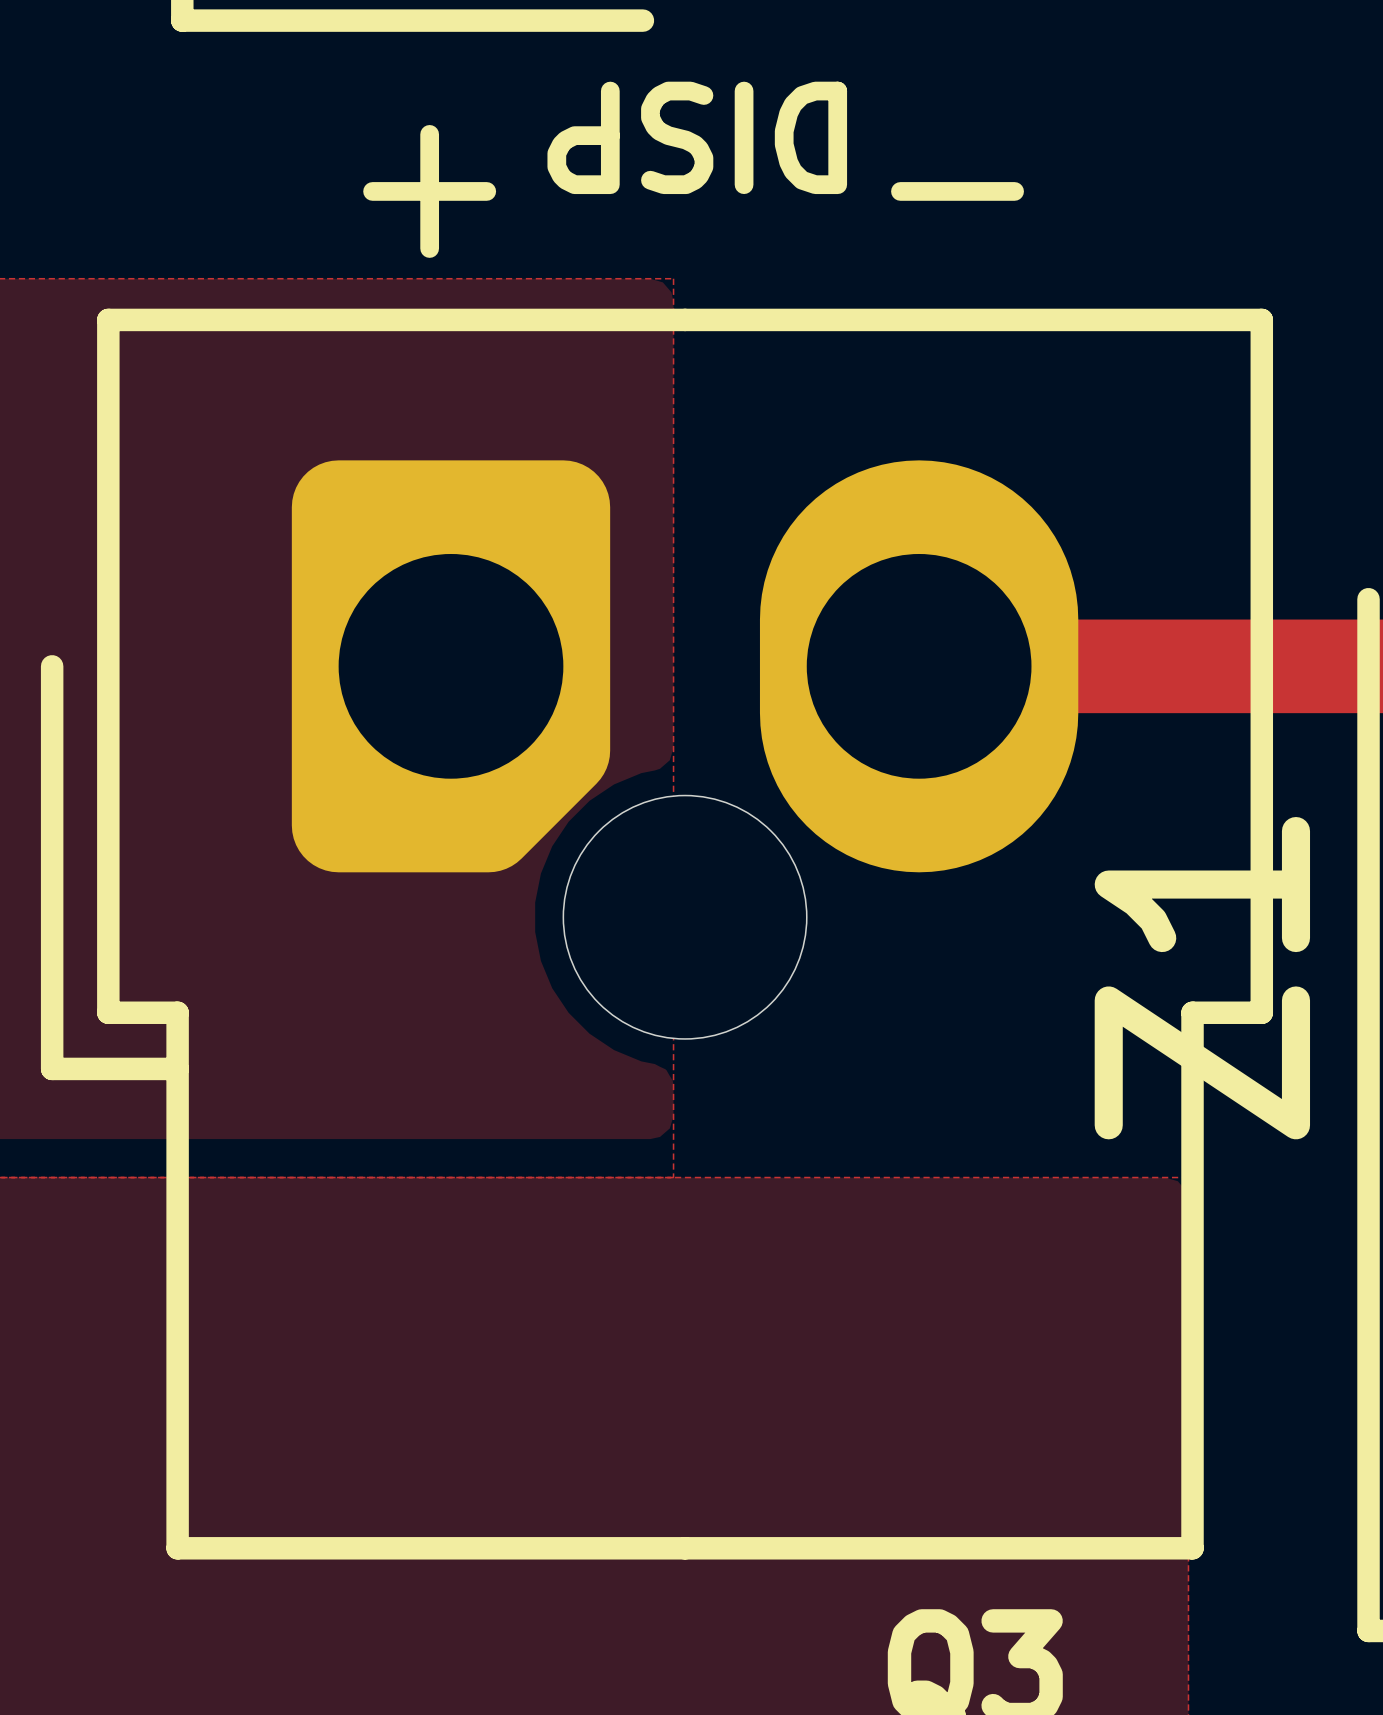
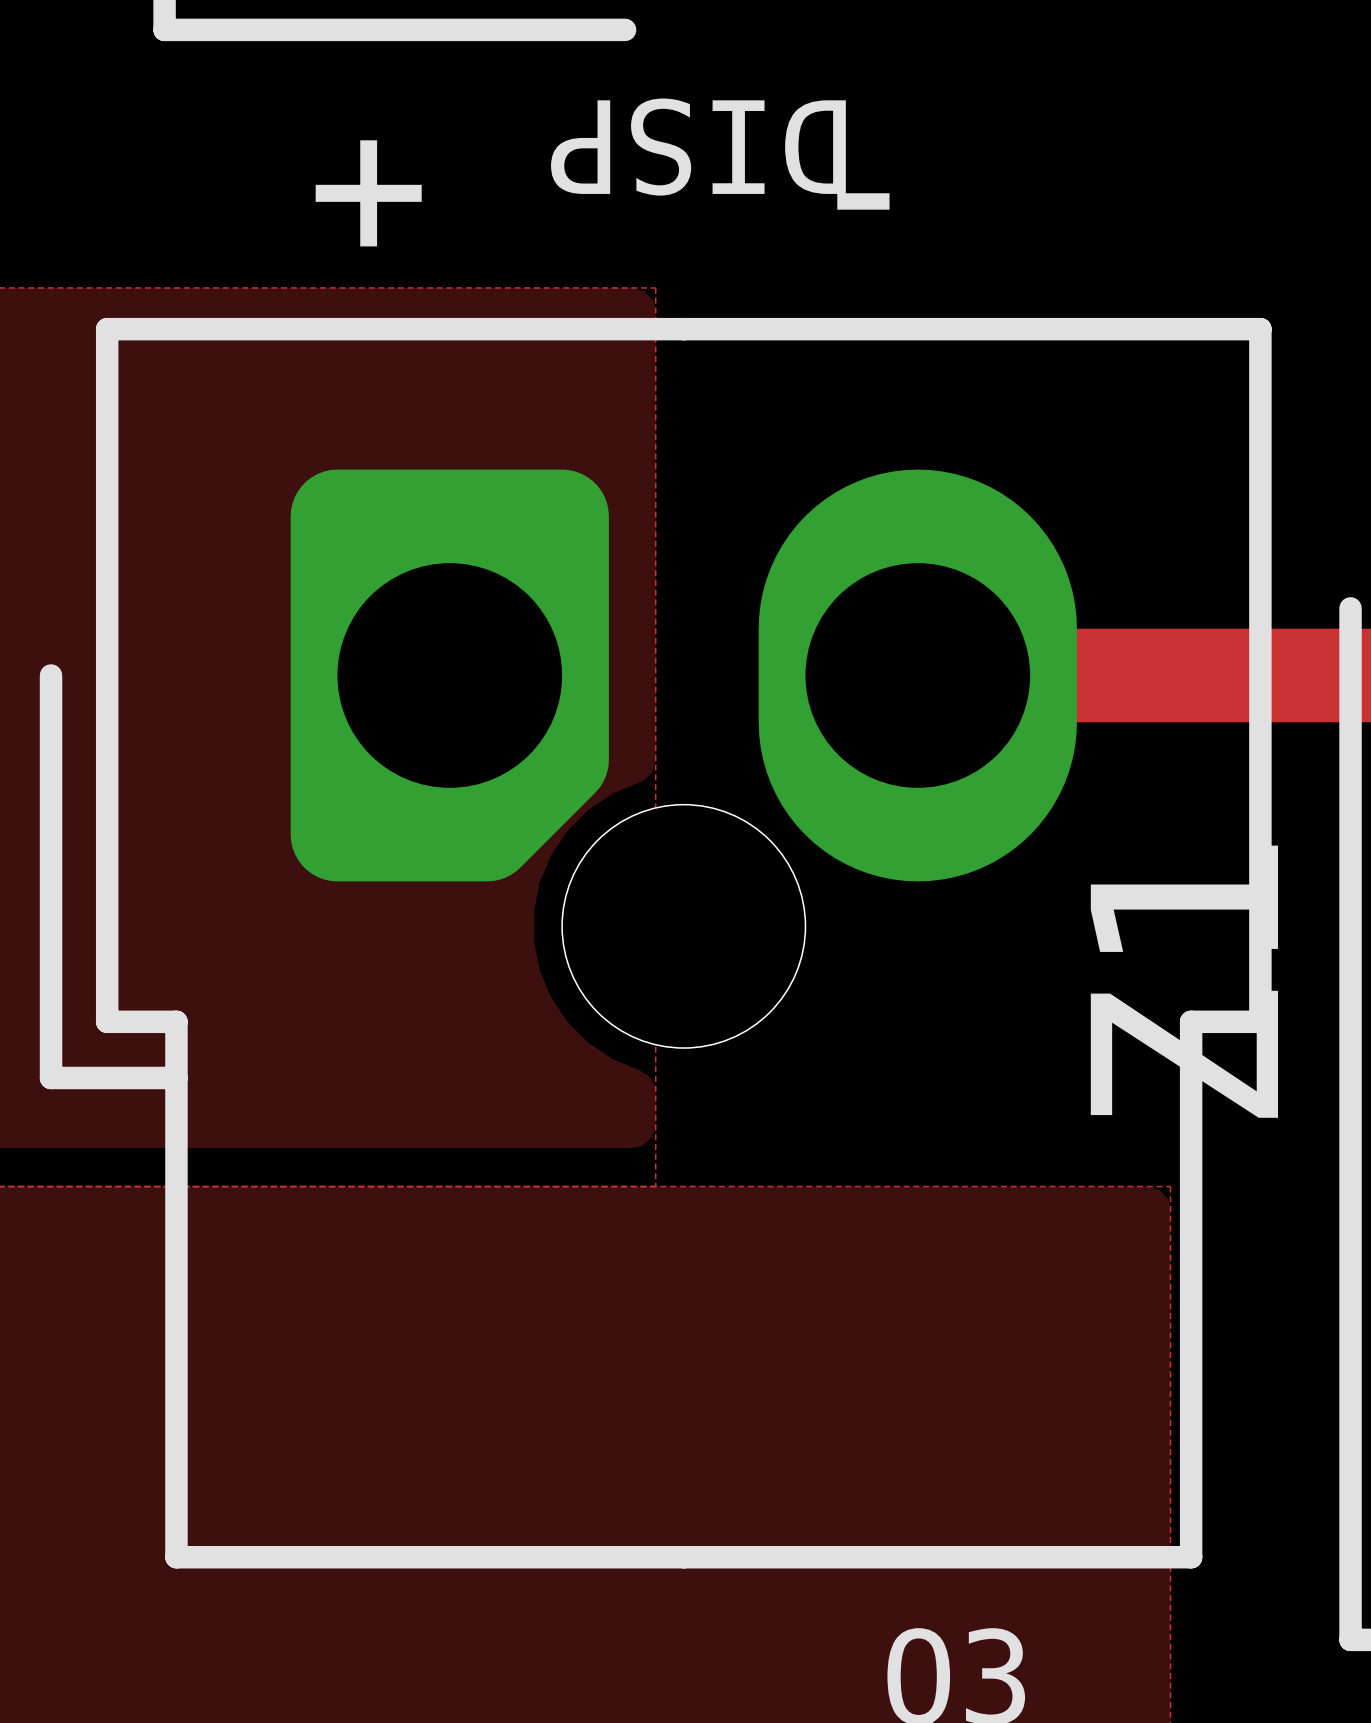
part position: (656, 934) -> (655, 943)

